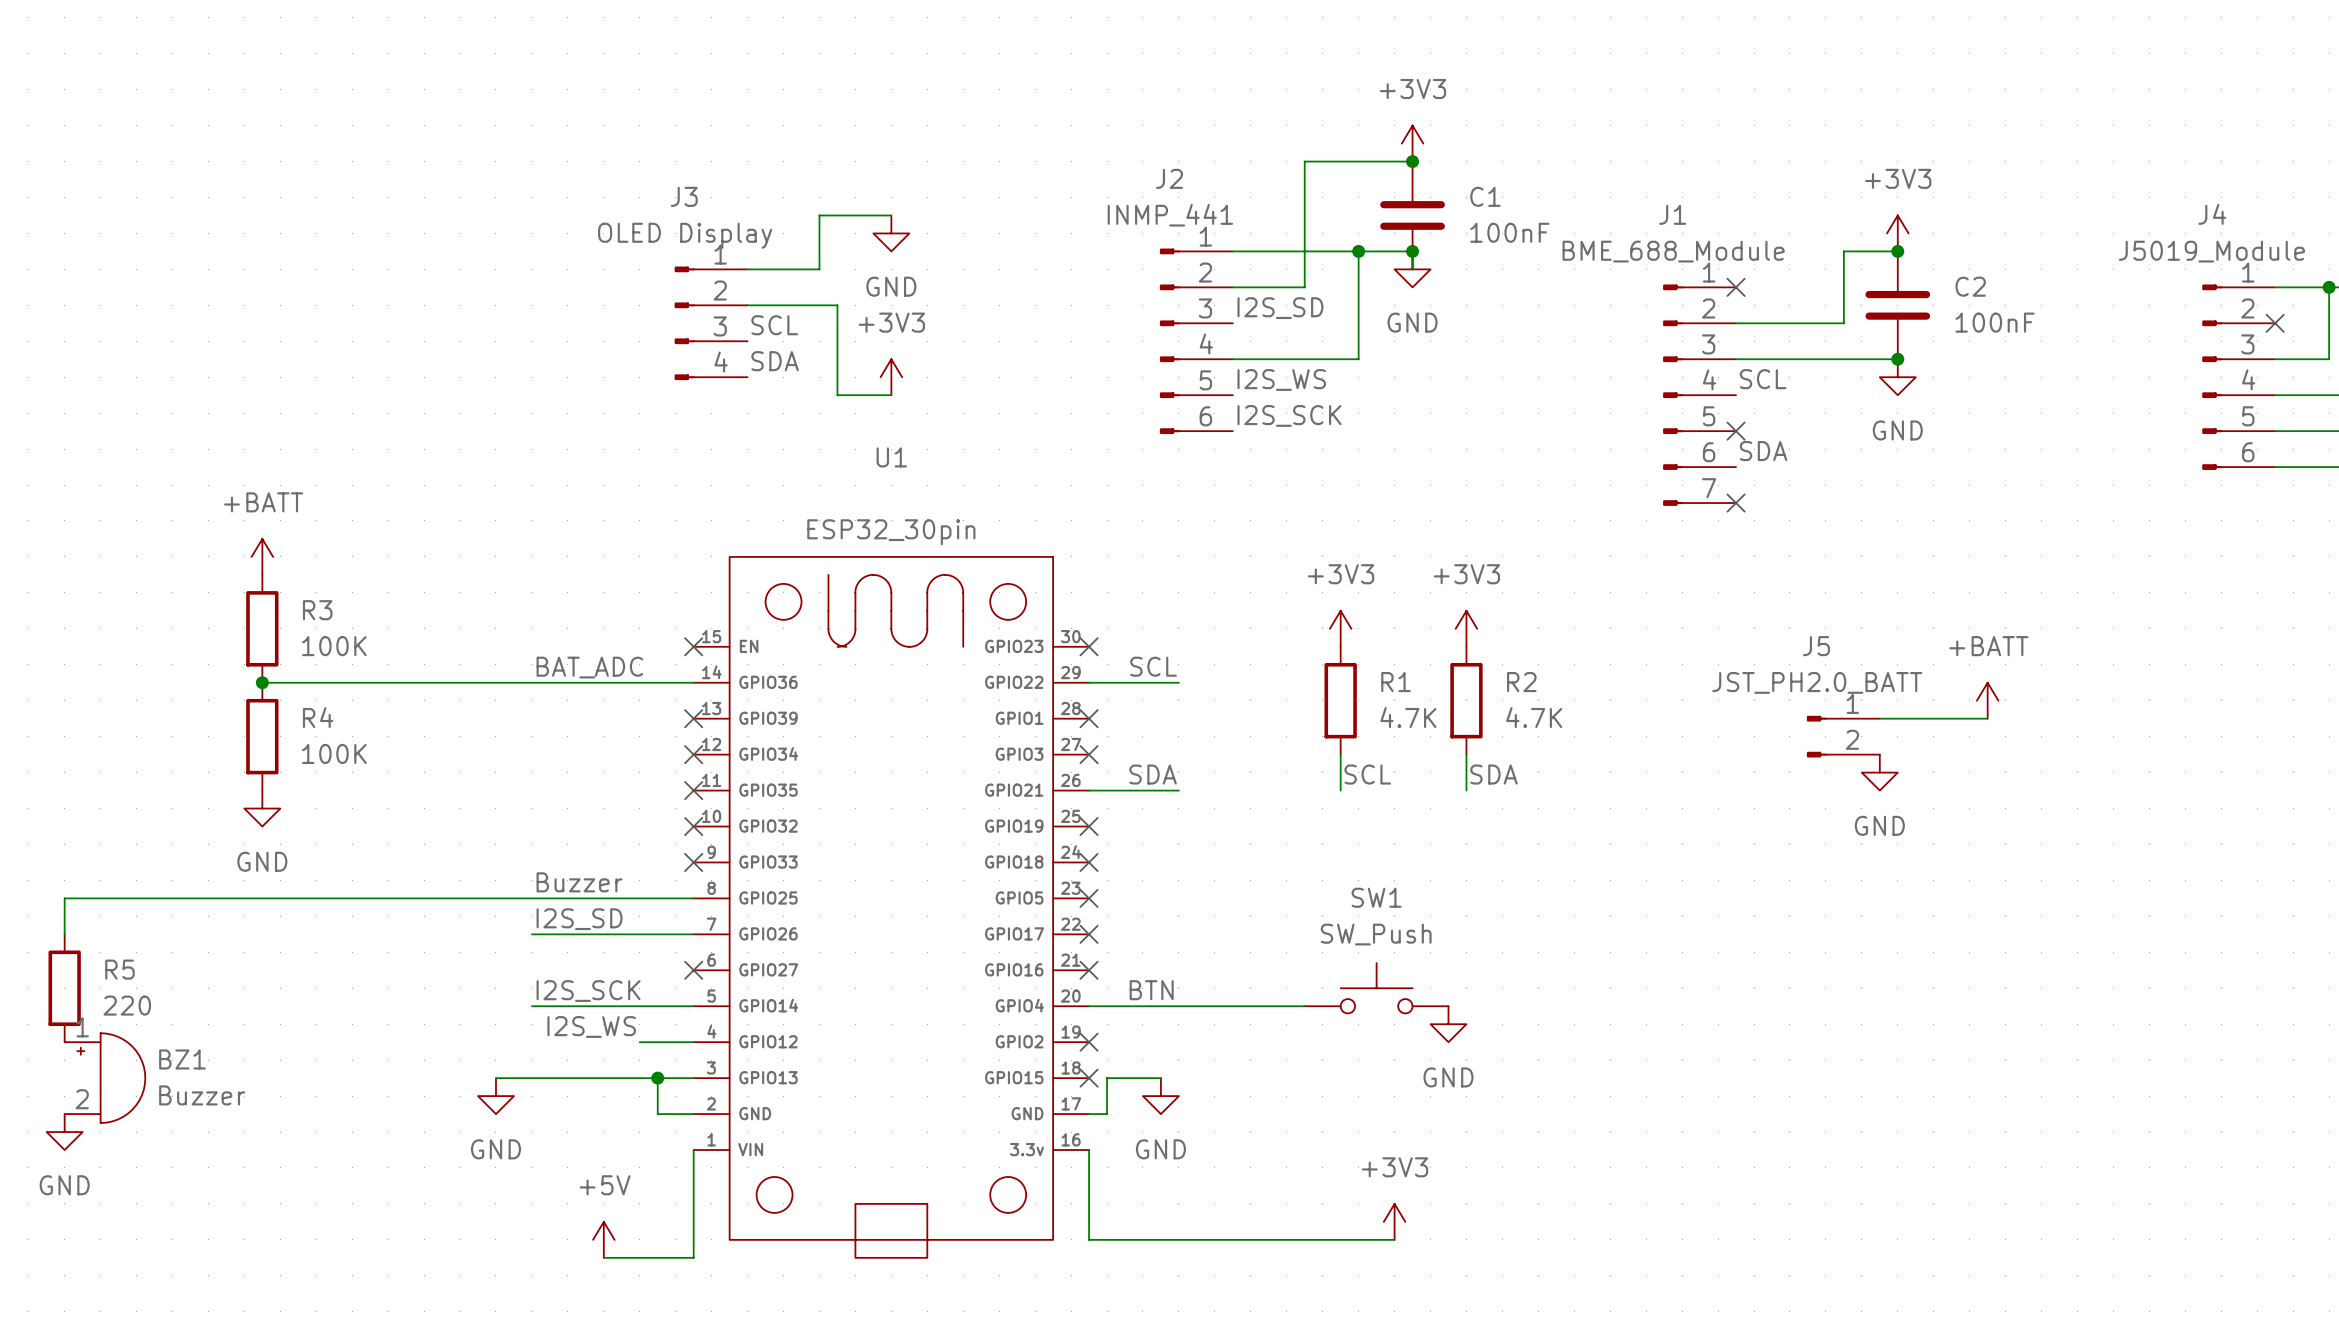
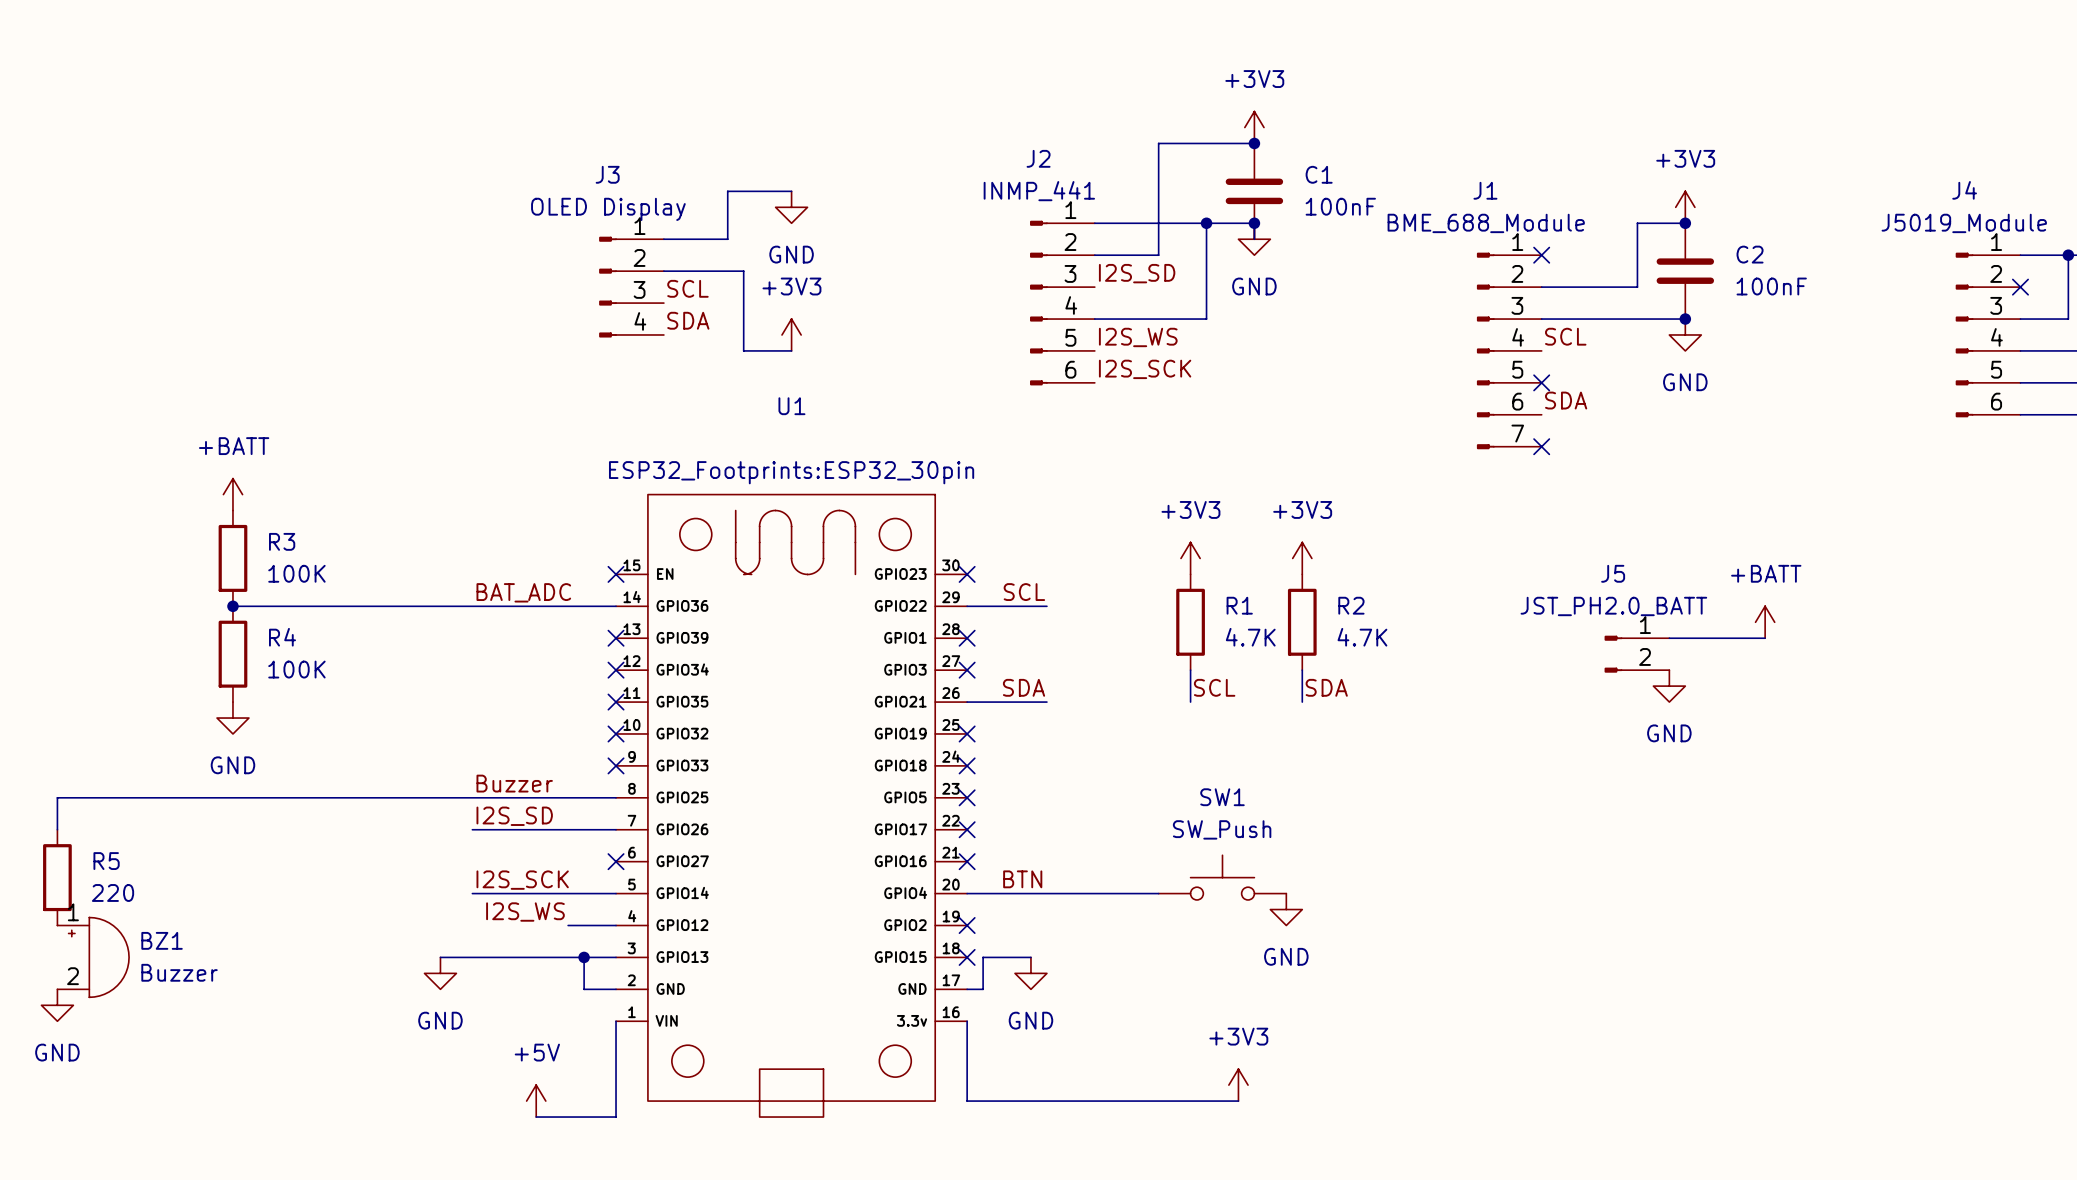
U1 text: ESP32_30pin (891, 532) -> ESP32_Footprints:ESP32_30pin (791, 472)

